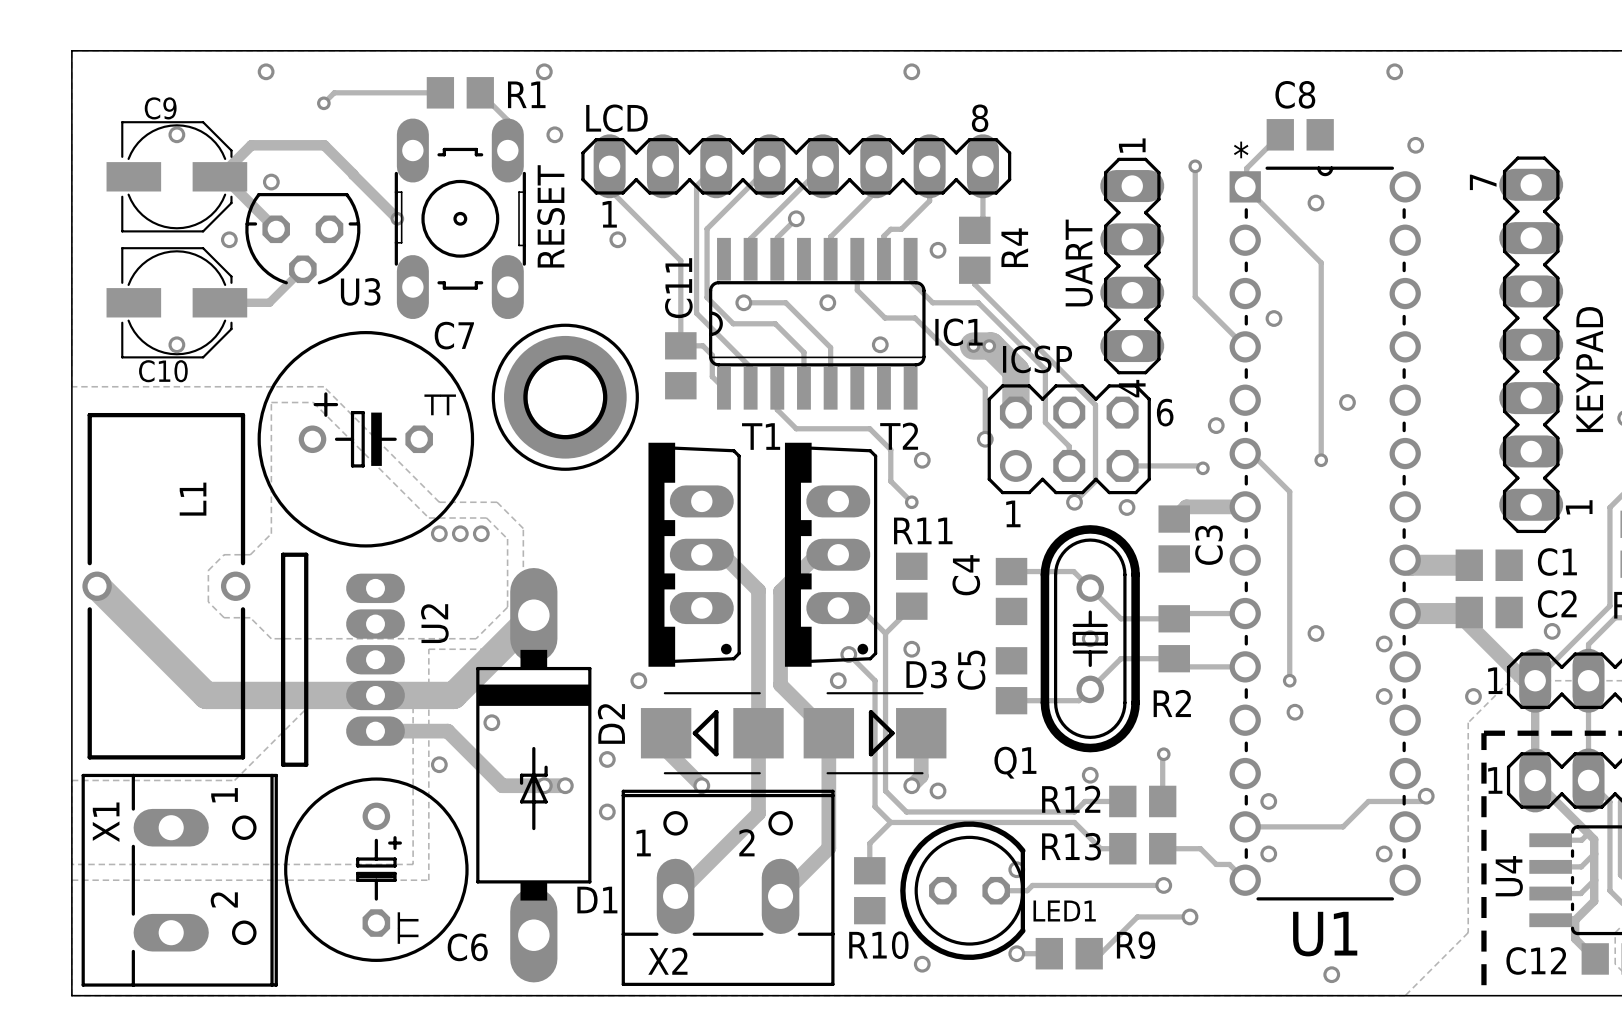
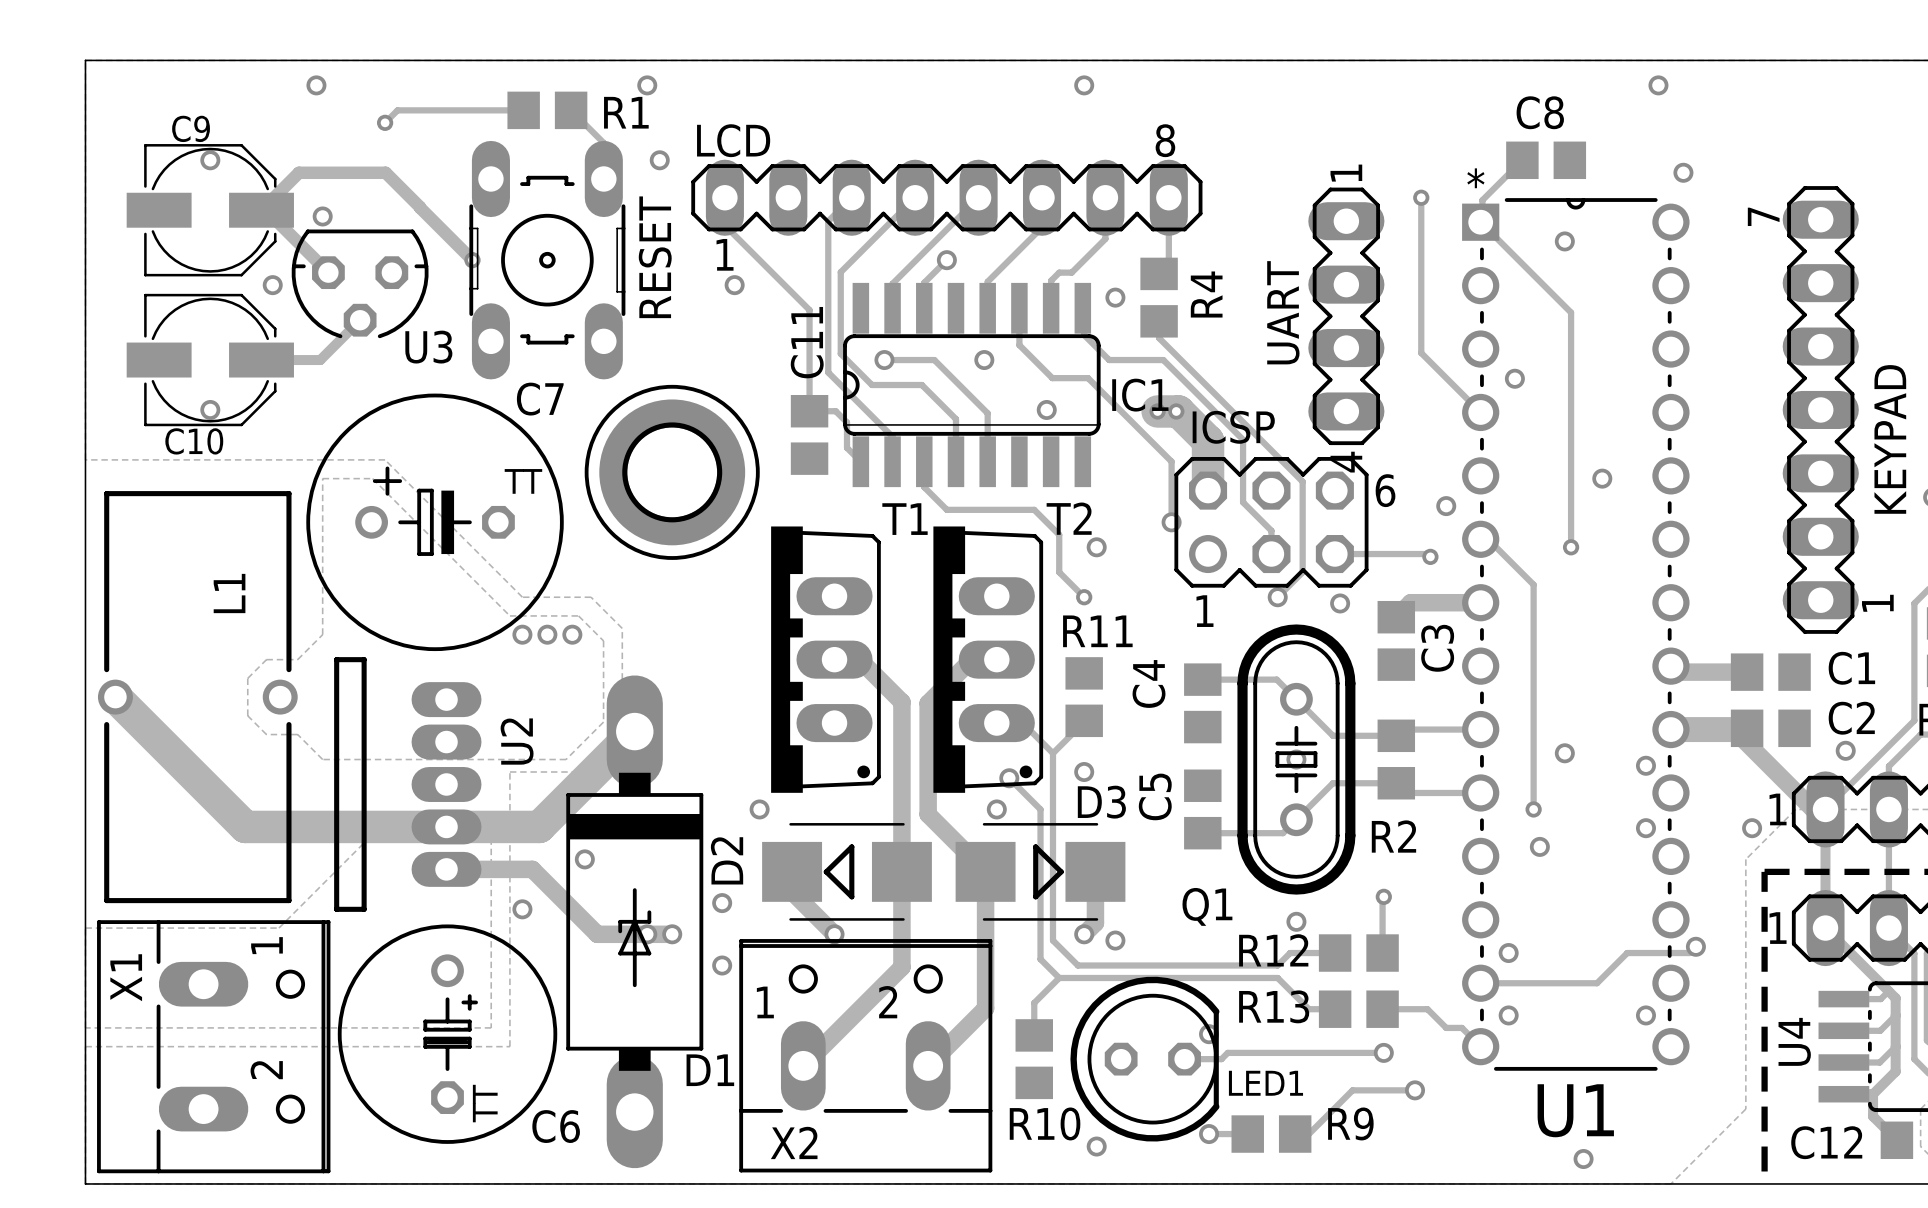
track width: thick (1405, 560) (1410, 565) (1469, 565) -> thin (1670, 666) (1676, 672) (1747, 672)

